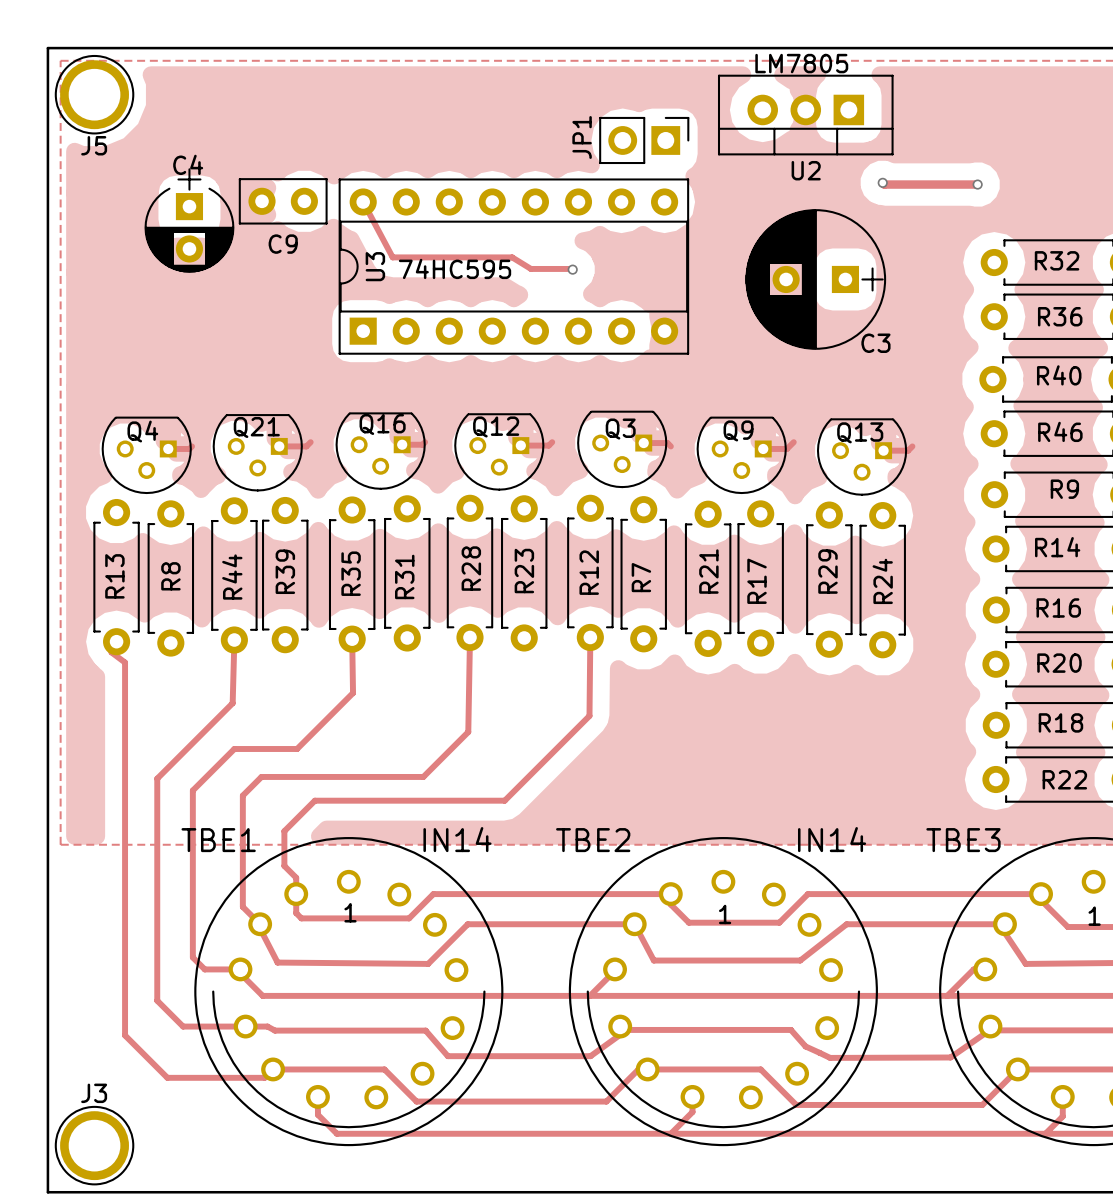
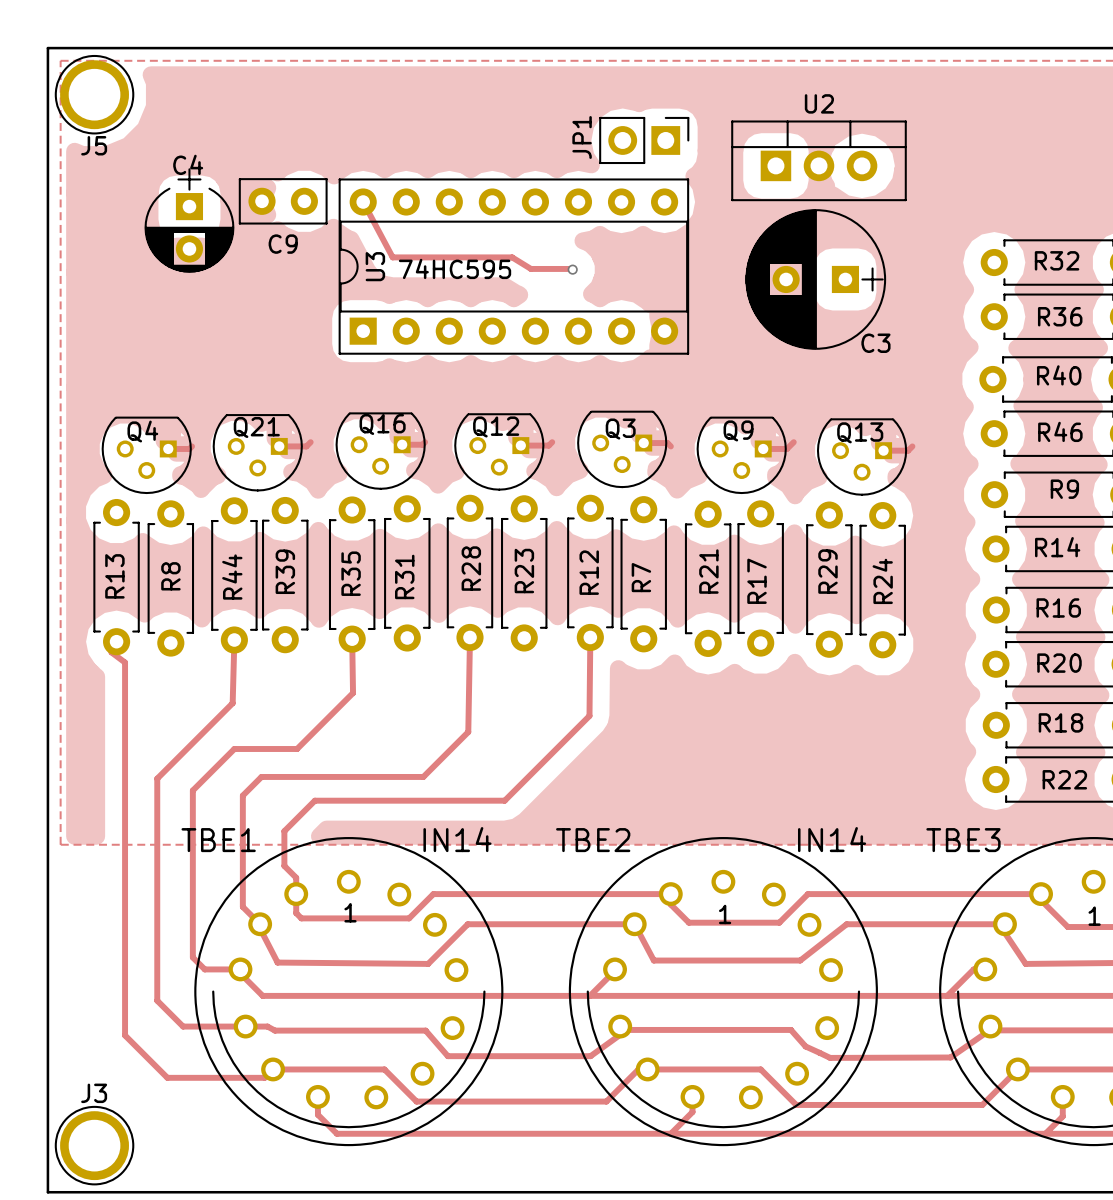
text: LM7805 (801, 63) -> none
U2 rotation: 0° (805, 115) -> 180° (819, 160)
track: (882, 182) (884, 184) (977, 184) -> none
via: (882, 182) -> none
via: (977, 184) -> none

